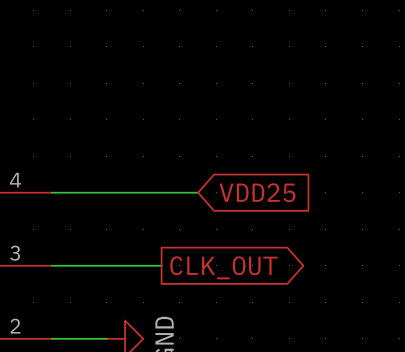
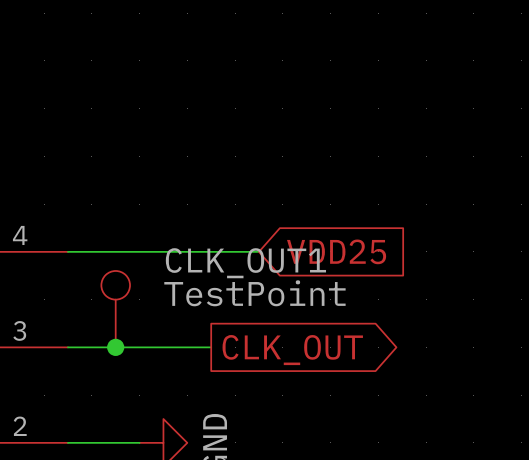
CLK_OUT1: none -> TestPoint (115, 309)
junction: none -> (115, 347)

